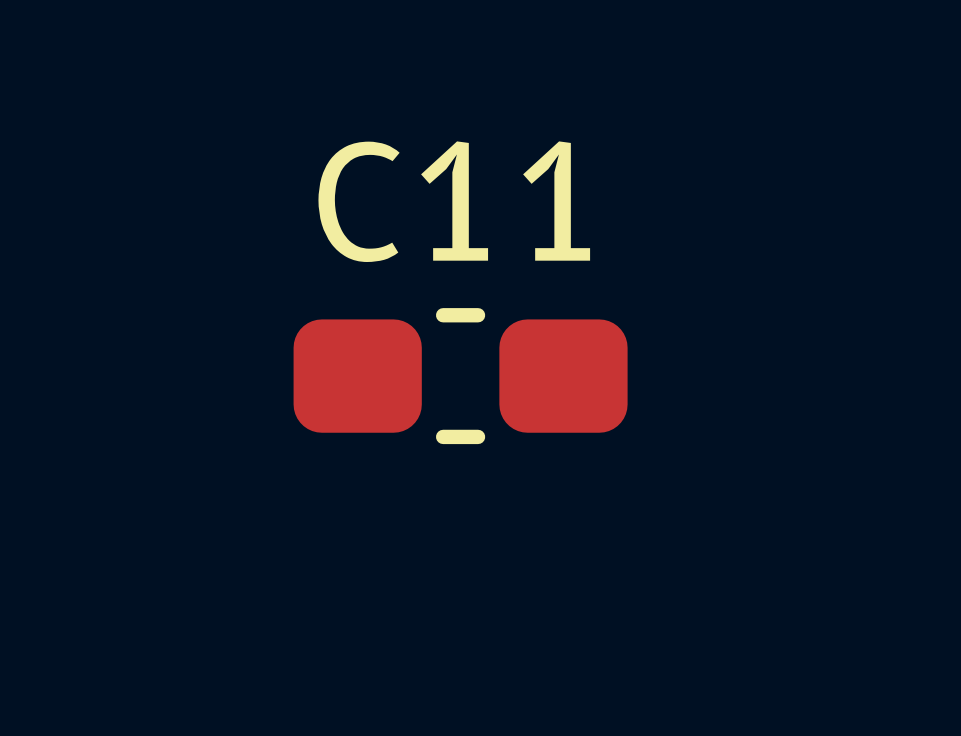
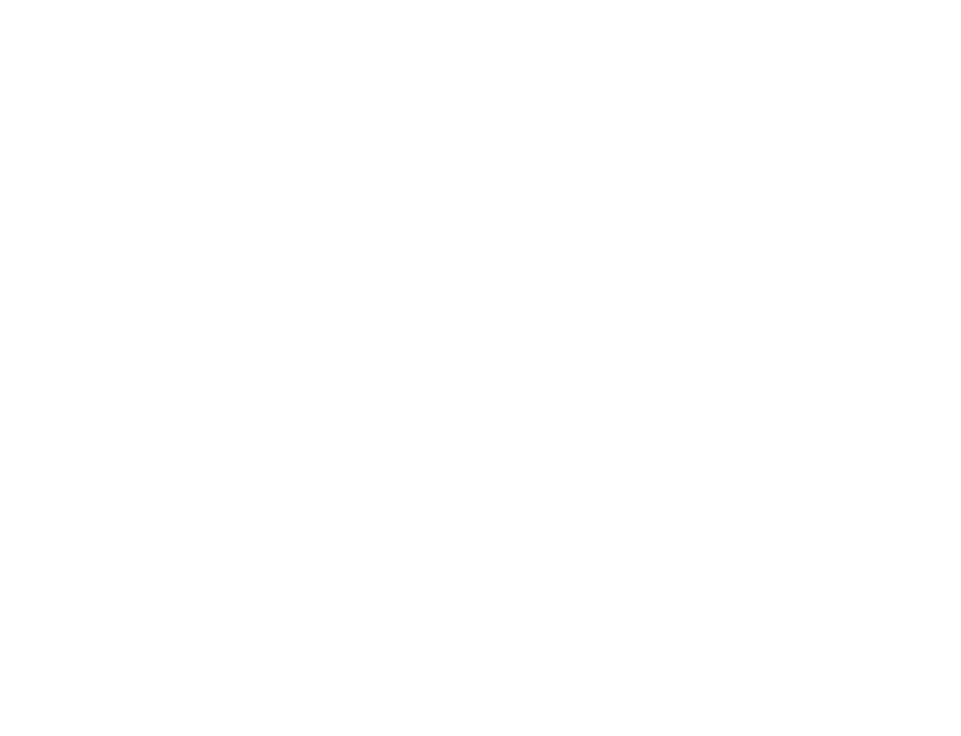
C11: (460, 376) -> none

